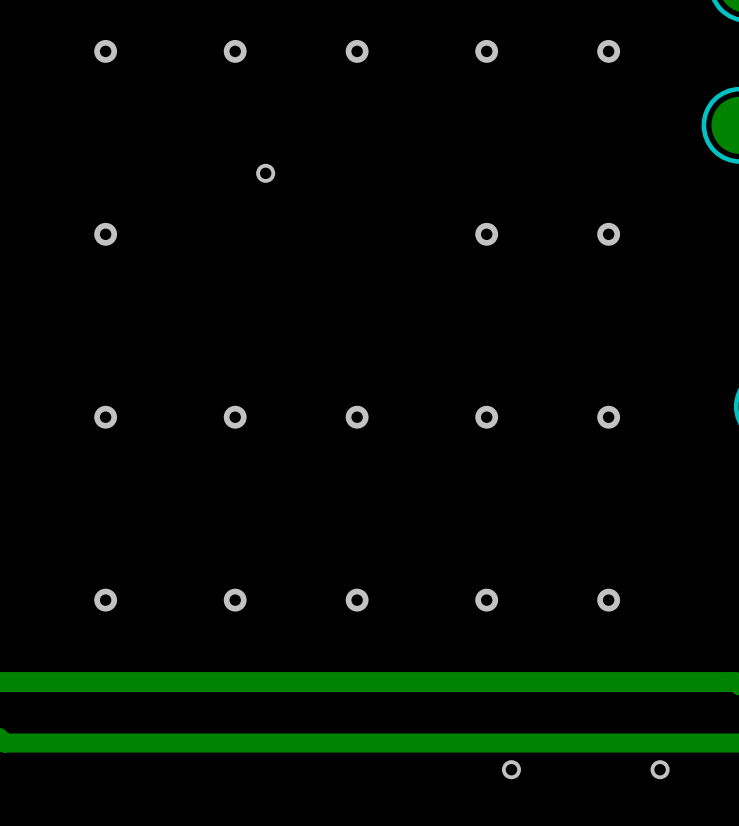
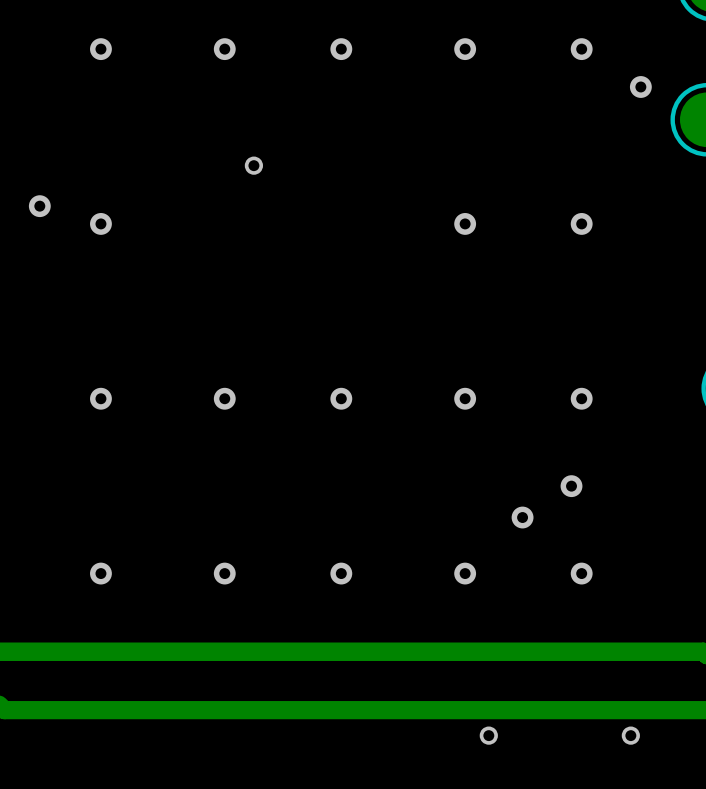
via: none -> (640, 86)
via: none -> (39, 206)
via: none -> (571, 486)
via: none -> (522, 517)

